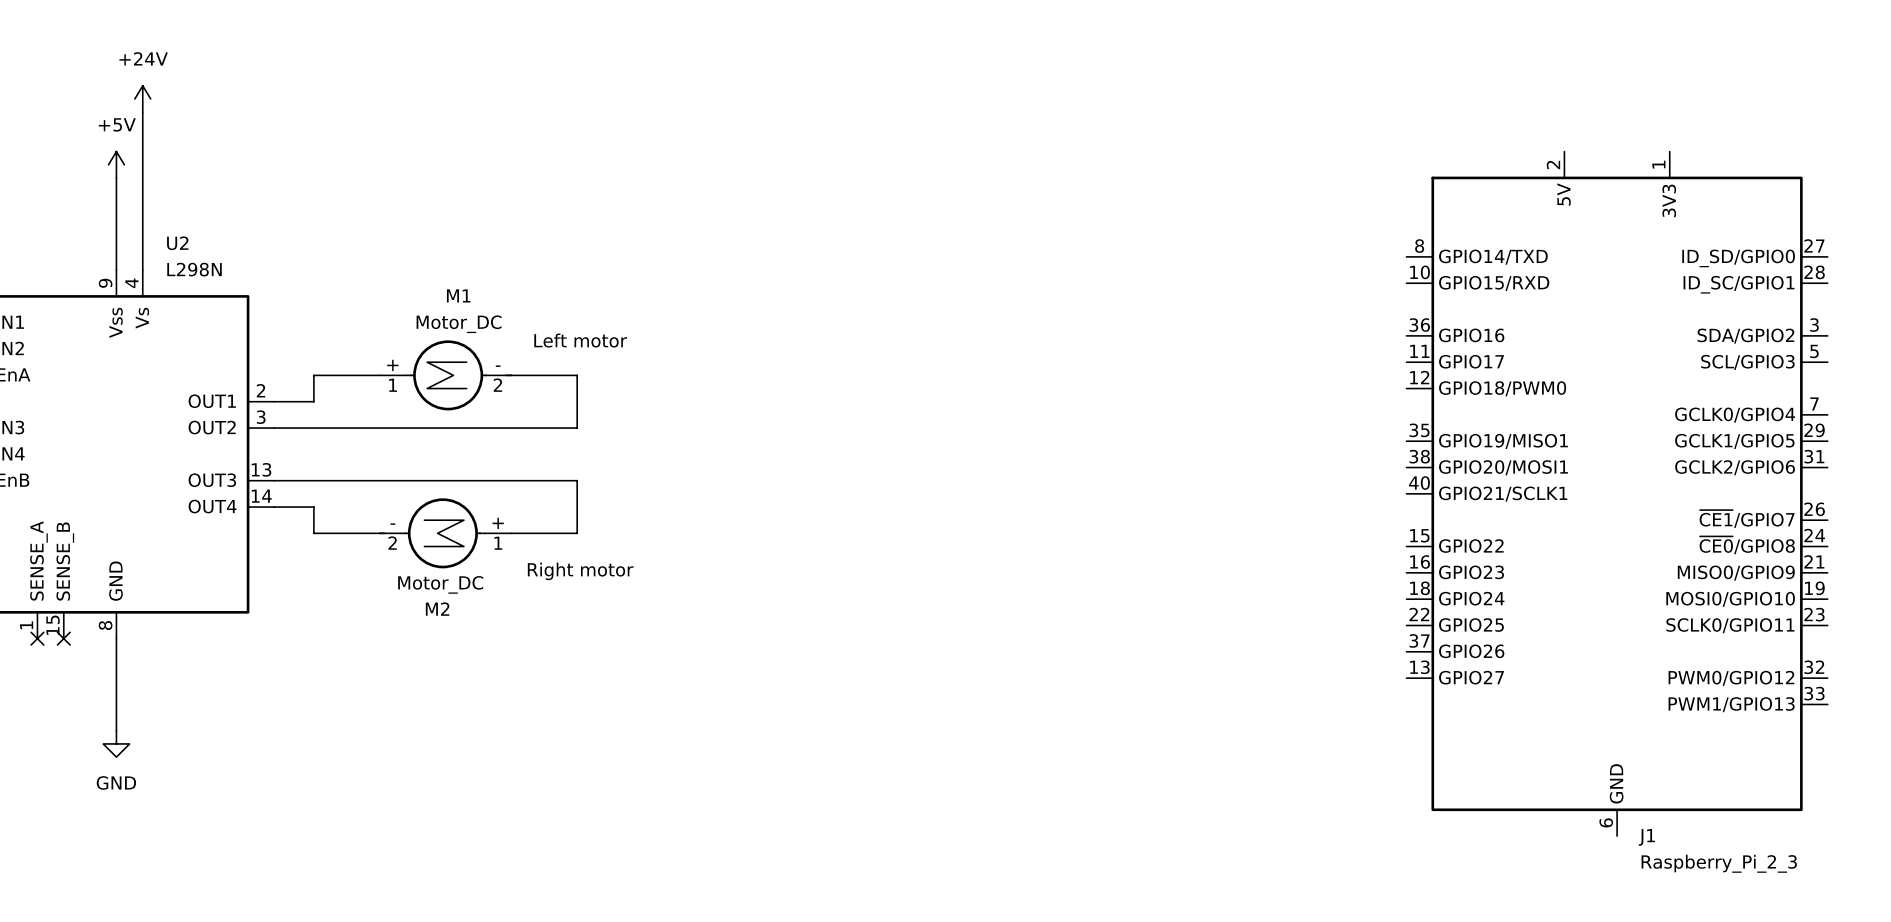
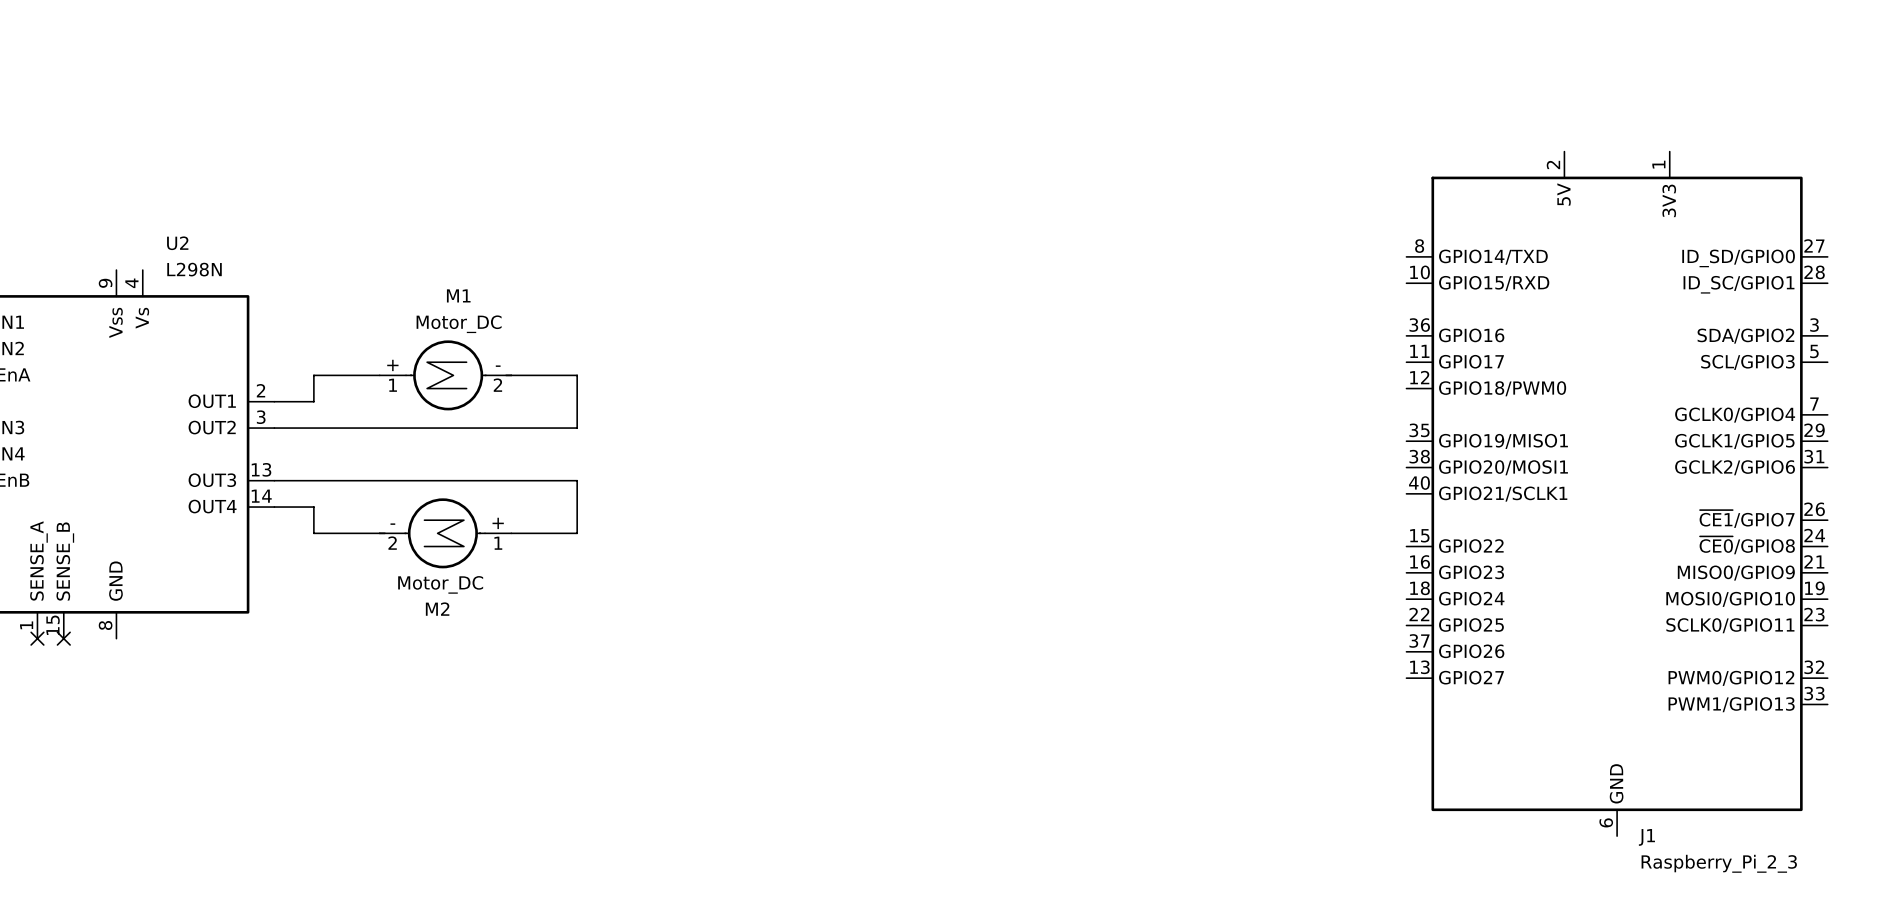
power symbol: +24V (142, 98) -> none
wire: (142, 112) (142, 270) -> none
power symbol: +5V (116, 164) -> none
wire: (116, 177) (116, 270) -> none
text: Left motor (580, 340) -> none
text: Right motor (580, 571) -> none
wire: (116, 638) (116, 730) -> none
power symbol: GND (116, 743) -> none

